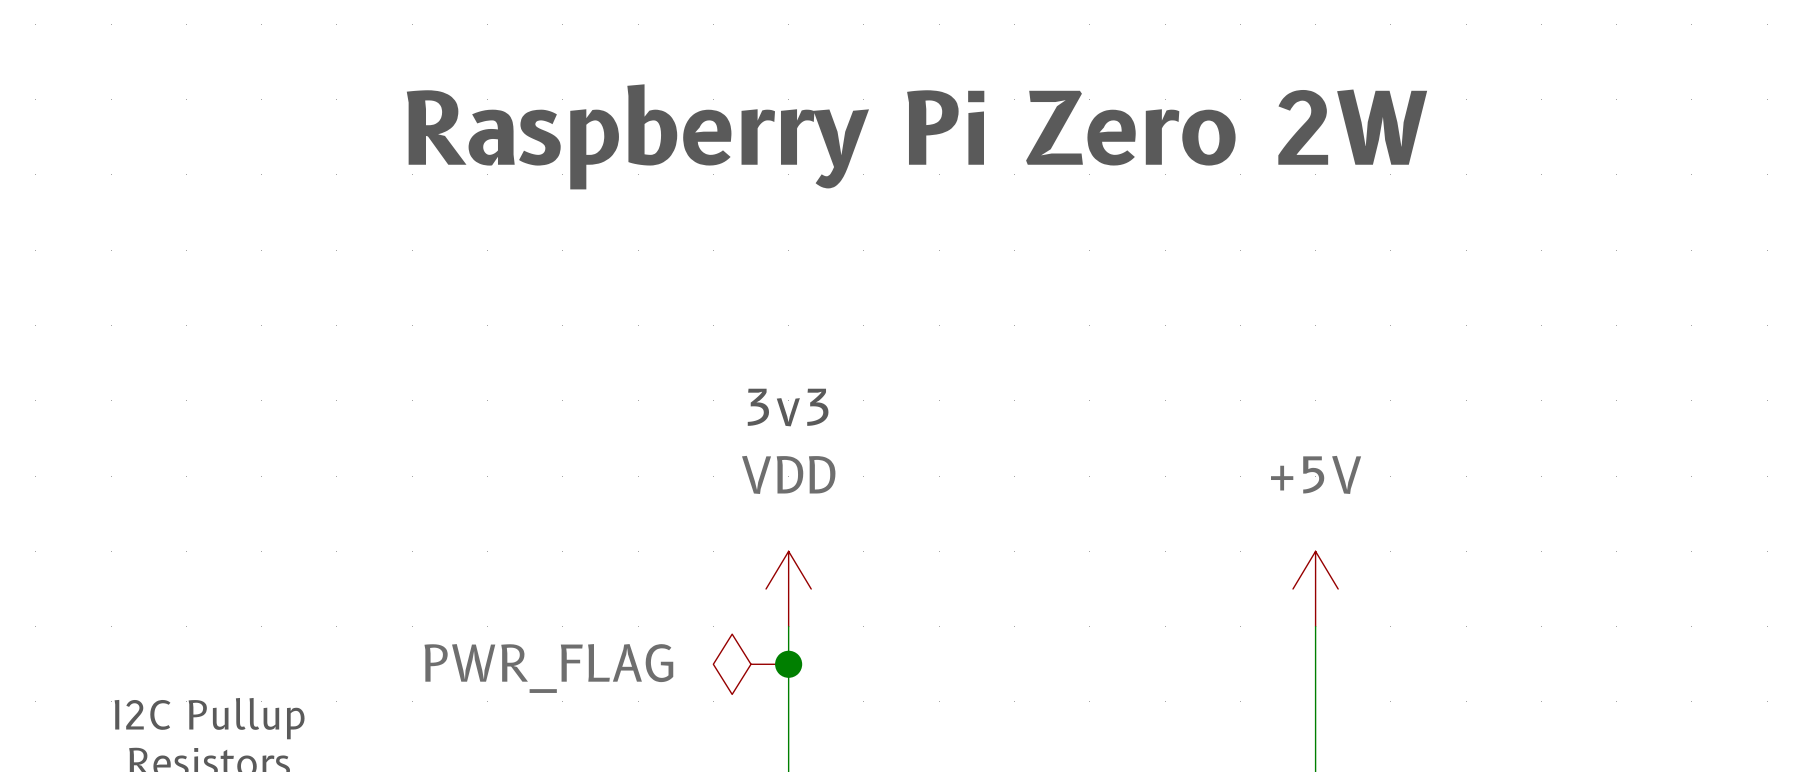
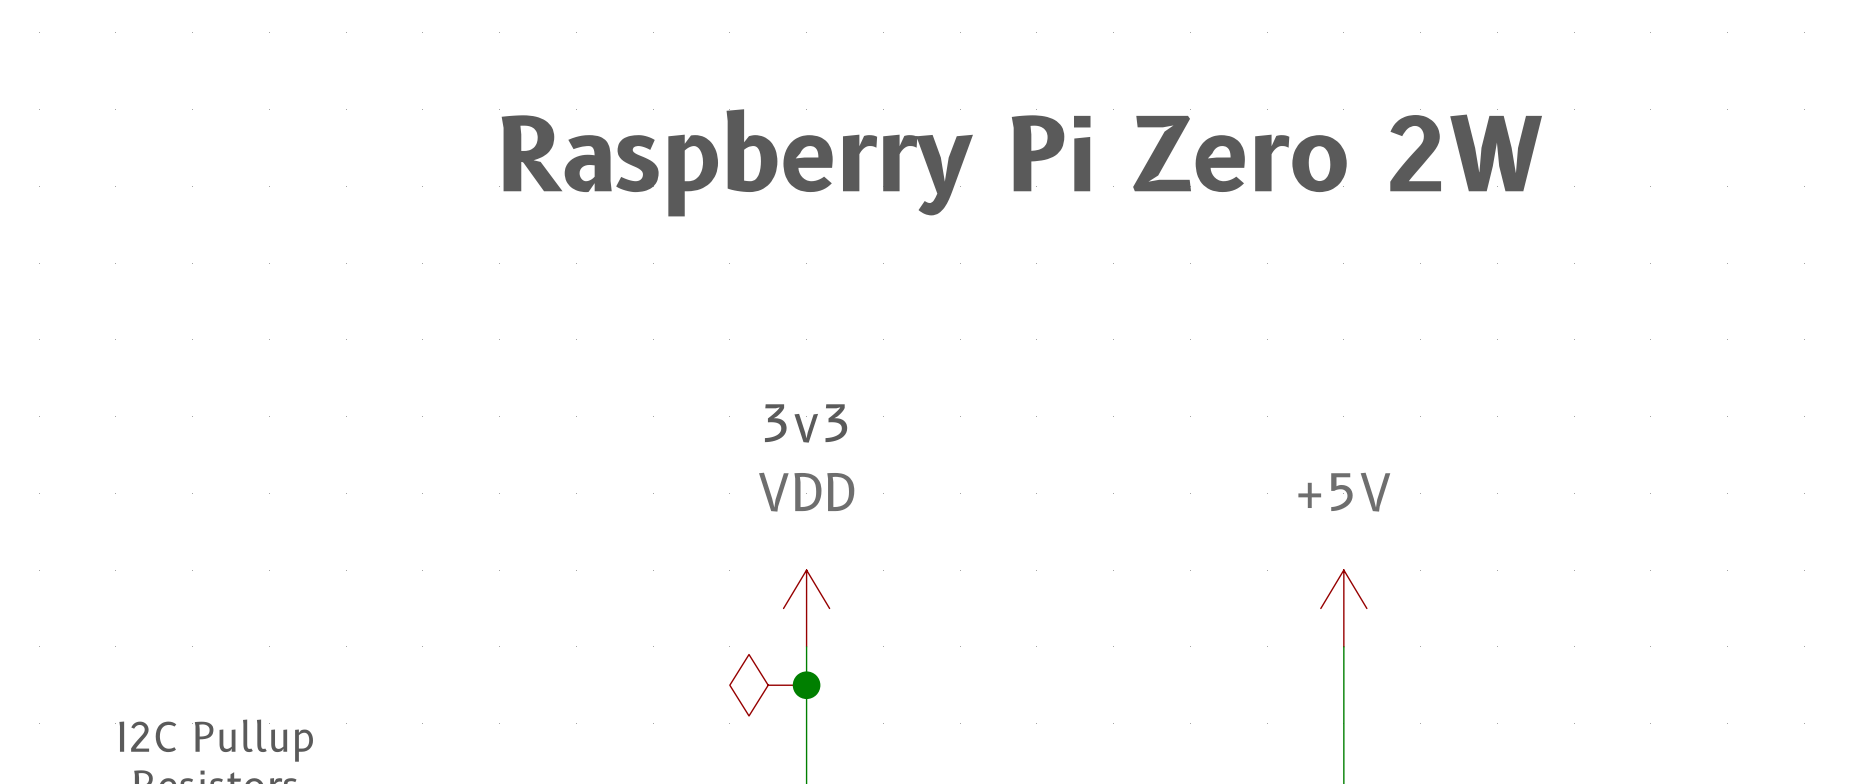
text position: Raspberry Pi Zero 2W (916, 136) -> Raspberry Pi Zero 2W (1021, 162)
power symbol text: PWR_FLAG (548, 668) -> none

